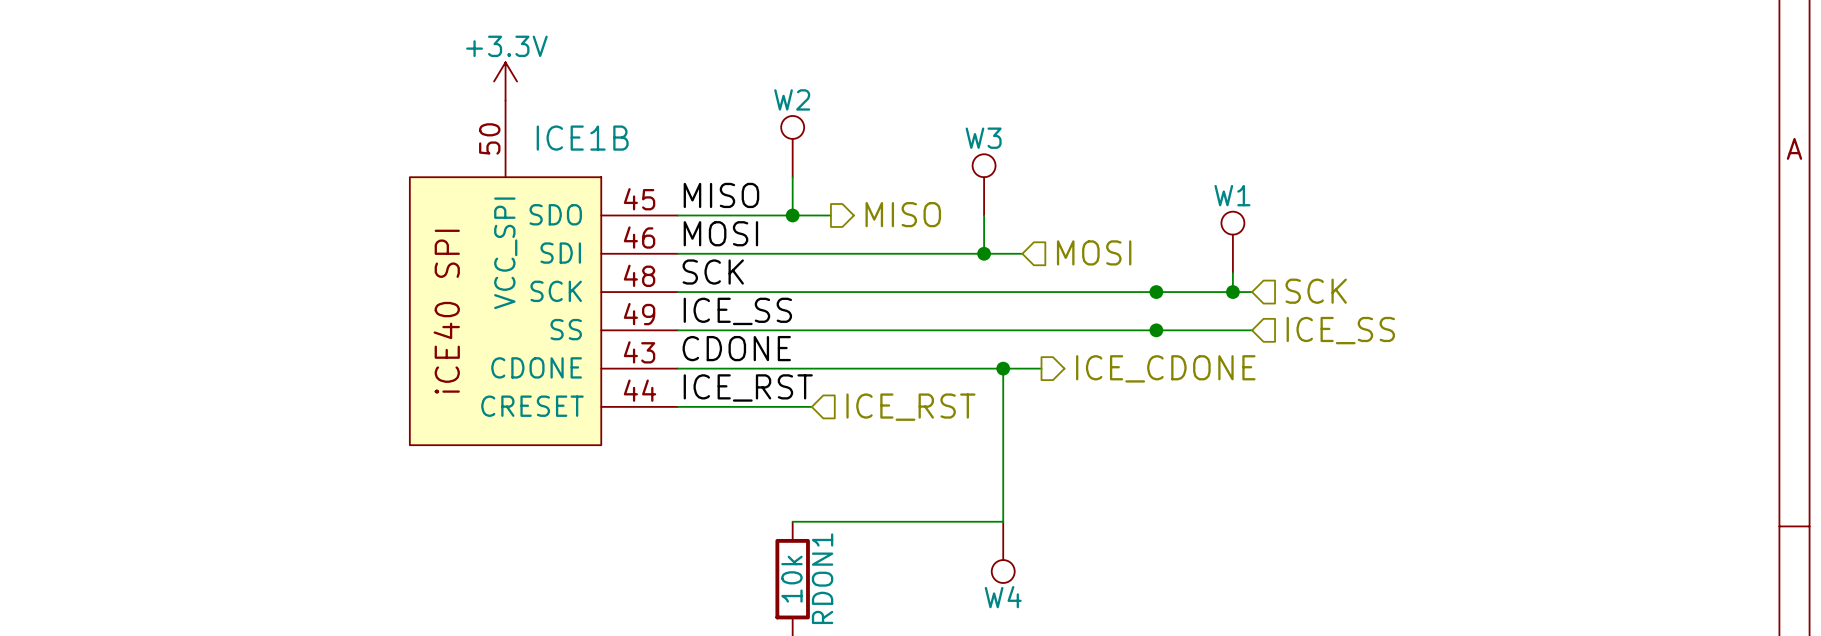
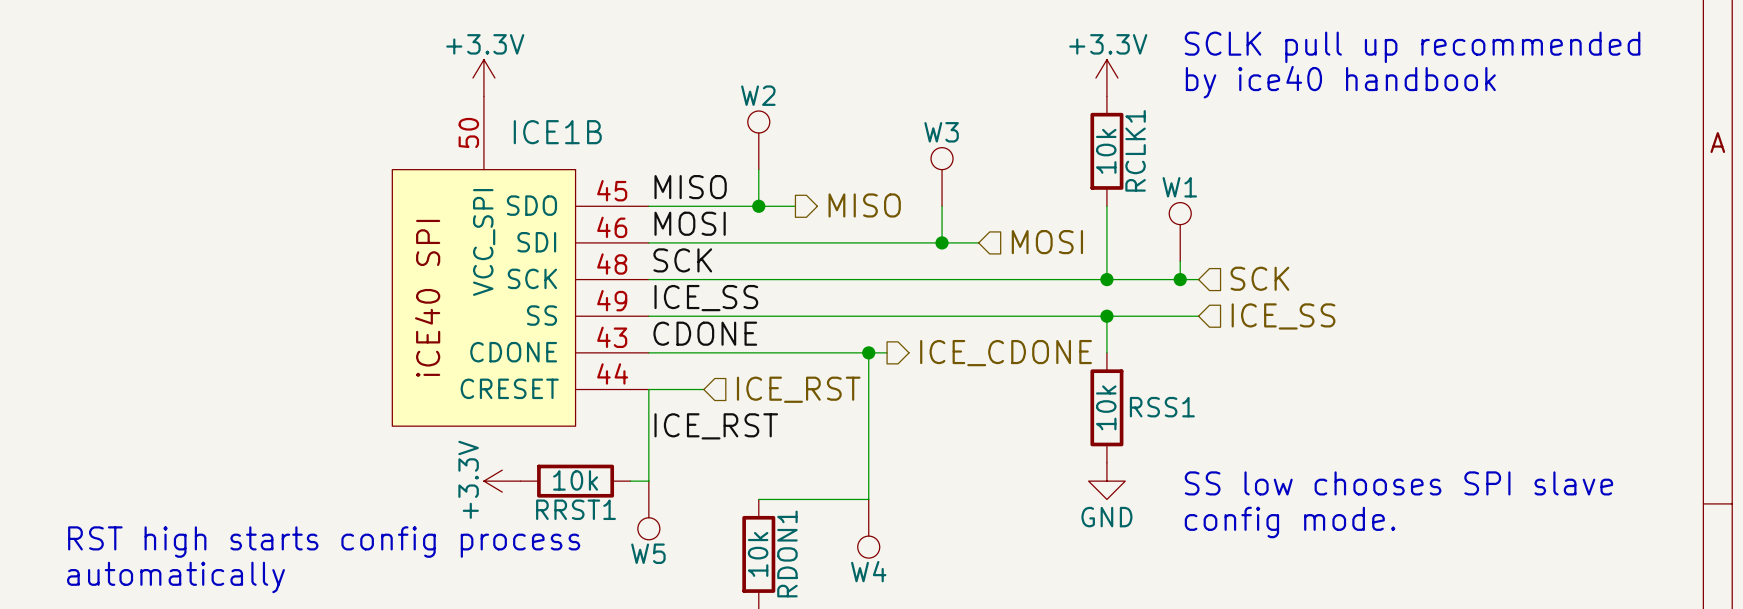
text: none -> SCLK pull up recommended (1412, 47)
power symbol: none -> +3.3V (1106, 78)
text: none -> by ice40 handbook (1340, 82)
RCLK1: none -> 10k (1106, 151)
wire: none -> (1106, 206) (1106, 279)
wire: none -> (1106, 316) (1106, 352)
junction: none -> (868, 352)
wire: (926, 368) (1041, 368) -> none
wire: (1003, 368) (1003, 521) (907, 521) -> (868, 352) (868, 499)
junction: (1003, 368) -> none
hierarchical label position: ICE_CDONE (1165, 368) -> ICE_CDONE (1006, 353)
label position: ICE_RST (748, 387) -> ICE_RST (716, 426)
wire: none -> (648, 389) (648, 481) (630, 481)
wire: (735, 406) (811, 406) -> none
hierarchical label position: ICE_RST (910, 407) -> ICE_RST (798, 389)
RSS1: none -> 10k (1106, 407)
power symbol: none -> +3.3V (502, 481)
RRST1: none -> 10k (575, 481)
power symbol: none -> GND (1106, 481)
text: none -> SS low chooses SPI slave (1398, 483)
W5: none -> (648, 510)
text: none -> config mode. (1290, 522)
W4 position: (1003, 552) -> (868, 528)
text: none -> RST high starts config process (324, 542)
text: none -> automatically (175, 577)

